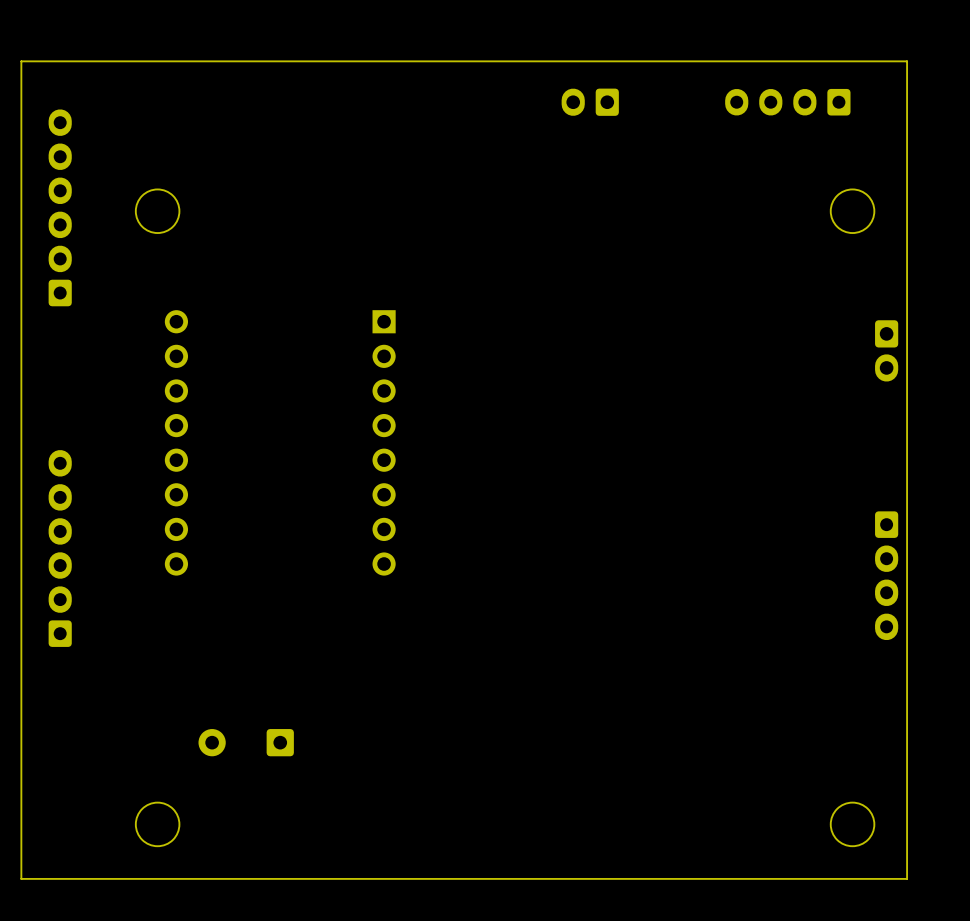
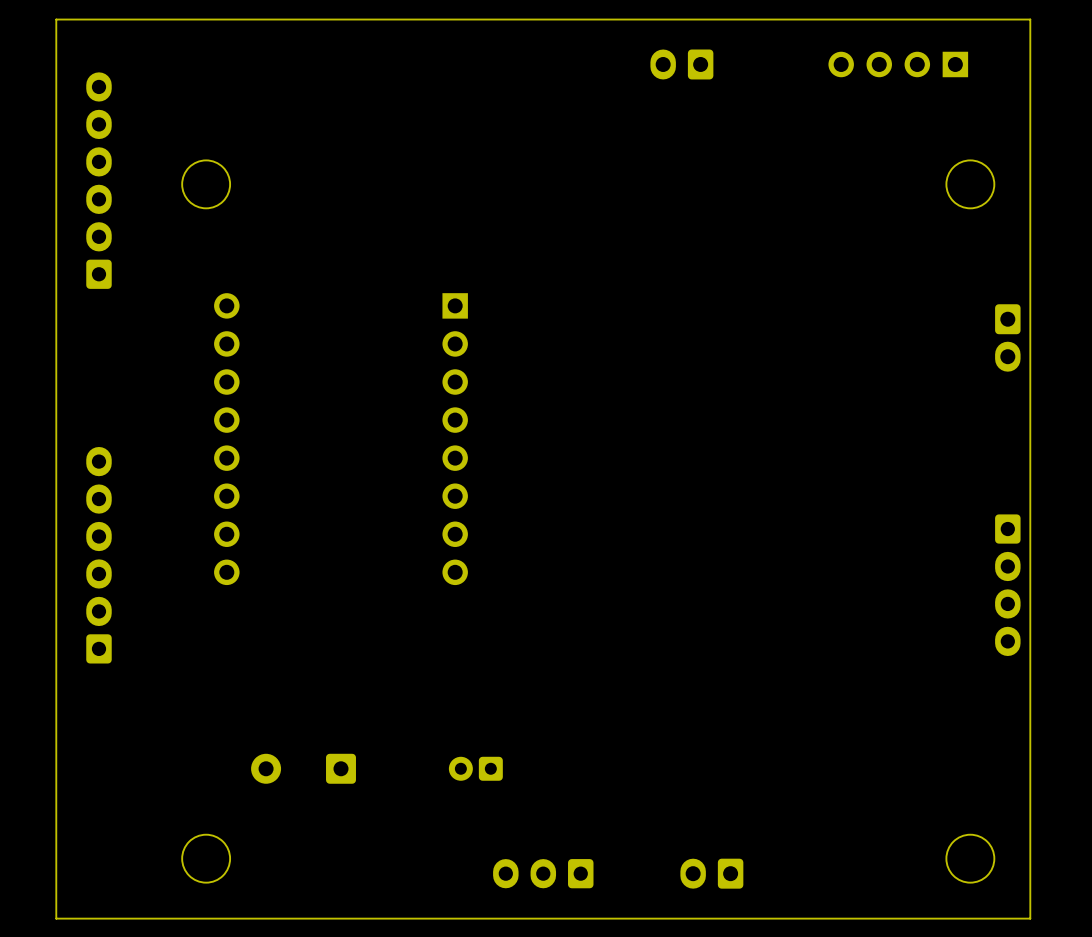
part footprint: [725, 88, 851, 116] -> [828, 51, 969, 78]
part: none -> (475, 768)
part: none -> (543, 873)
part: none -> (711, 873)

